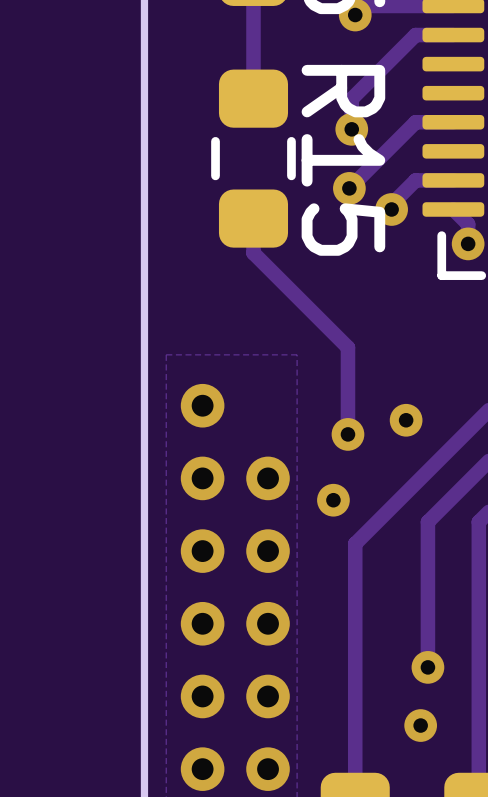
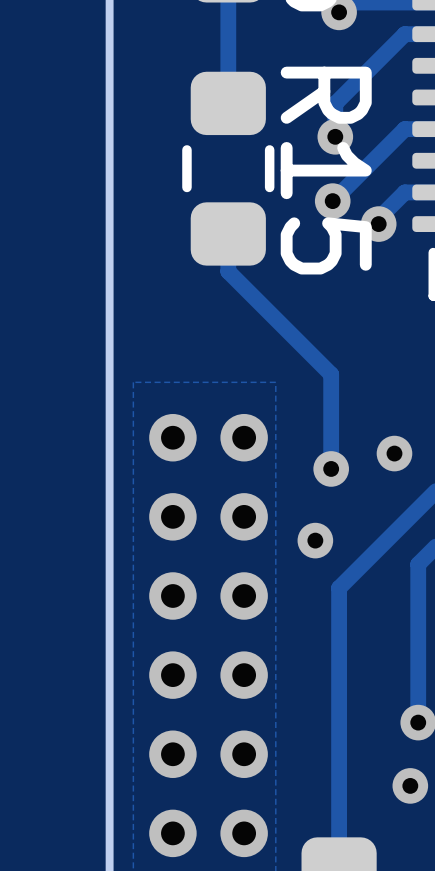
via: none -> (244, 437)

